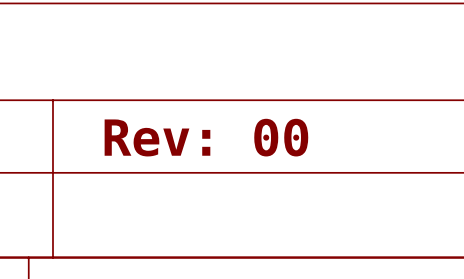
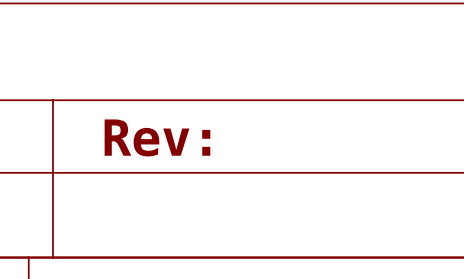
title block: Rev: 00 (206, 137) -> Rev: (157, 137)

